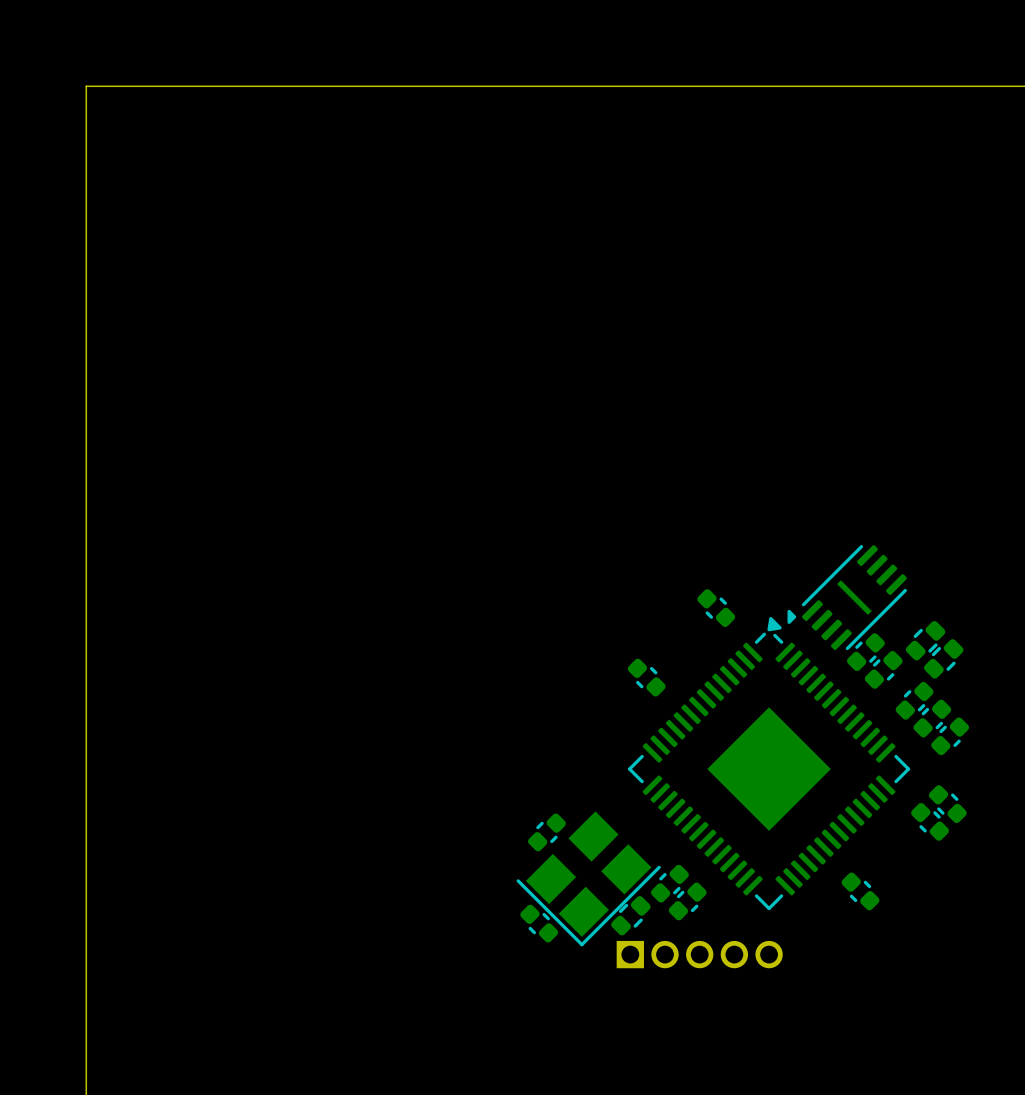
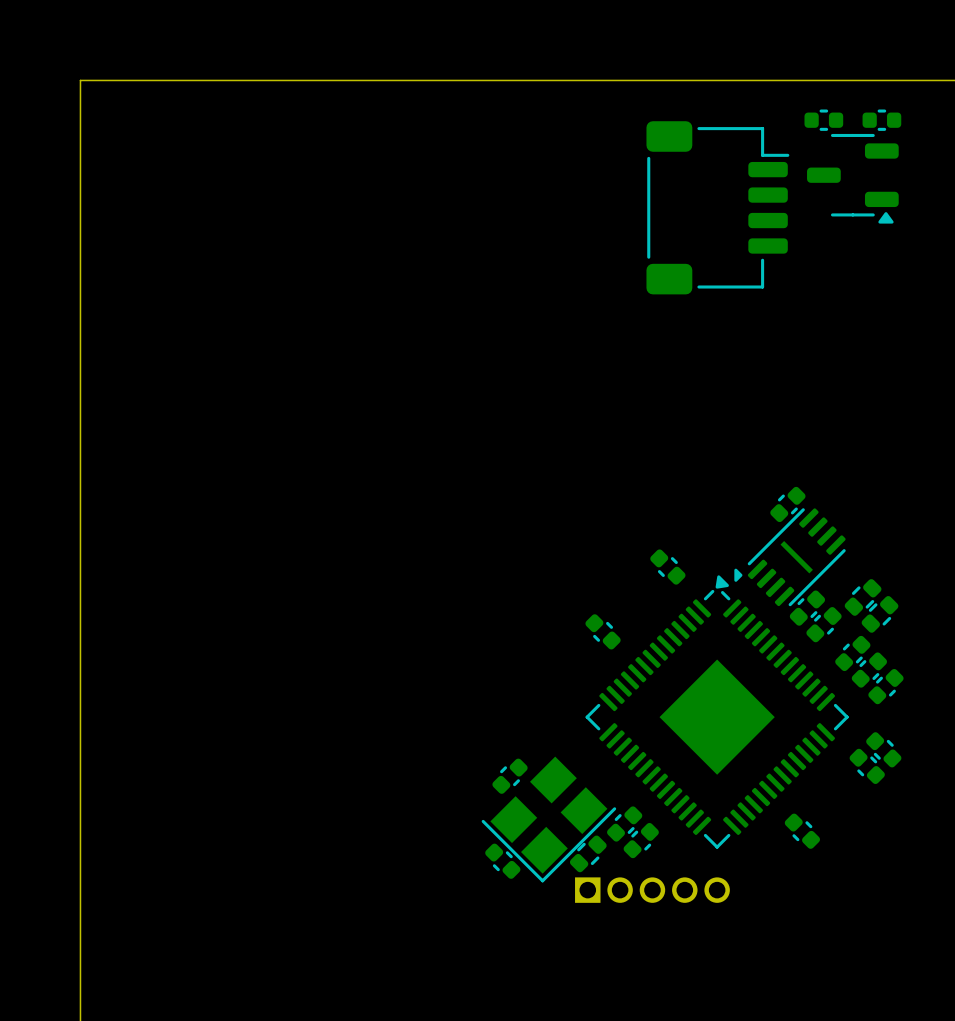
part: none -> (823, 120)
part: none -> (881, 120)
part: none -> (852, 178)
part: none -> (717, 207)
part: none -> (787, 504)

